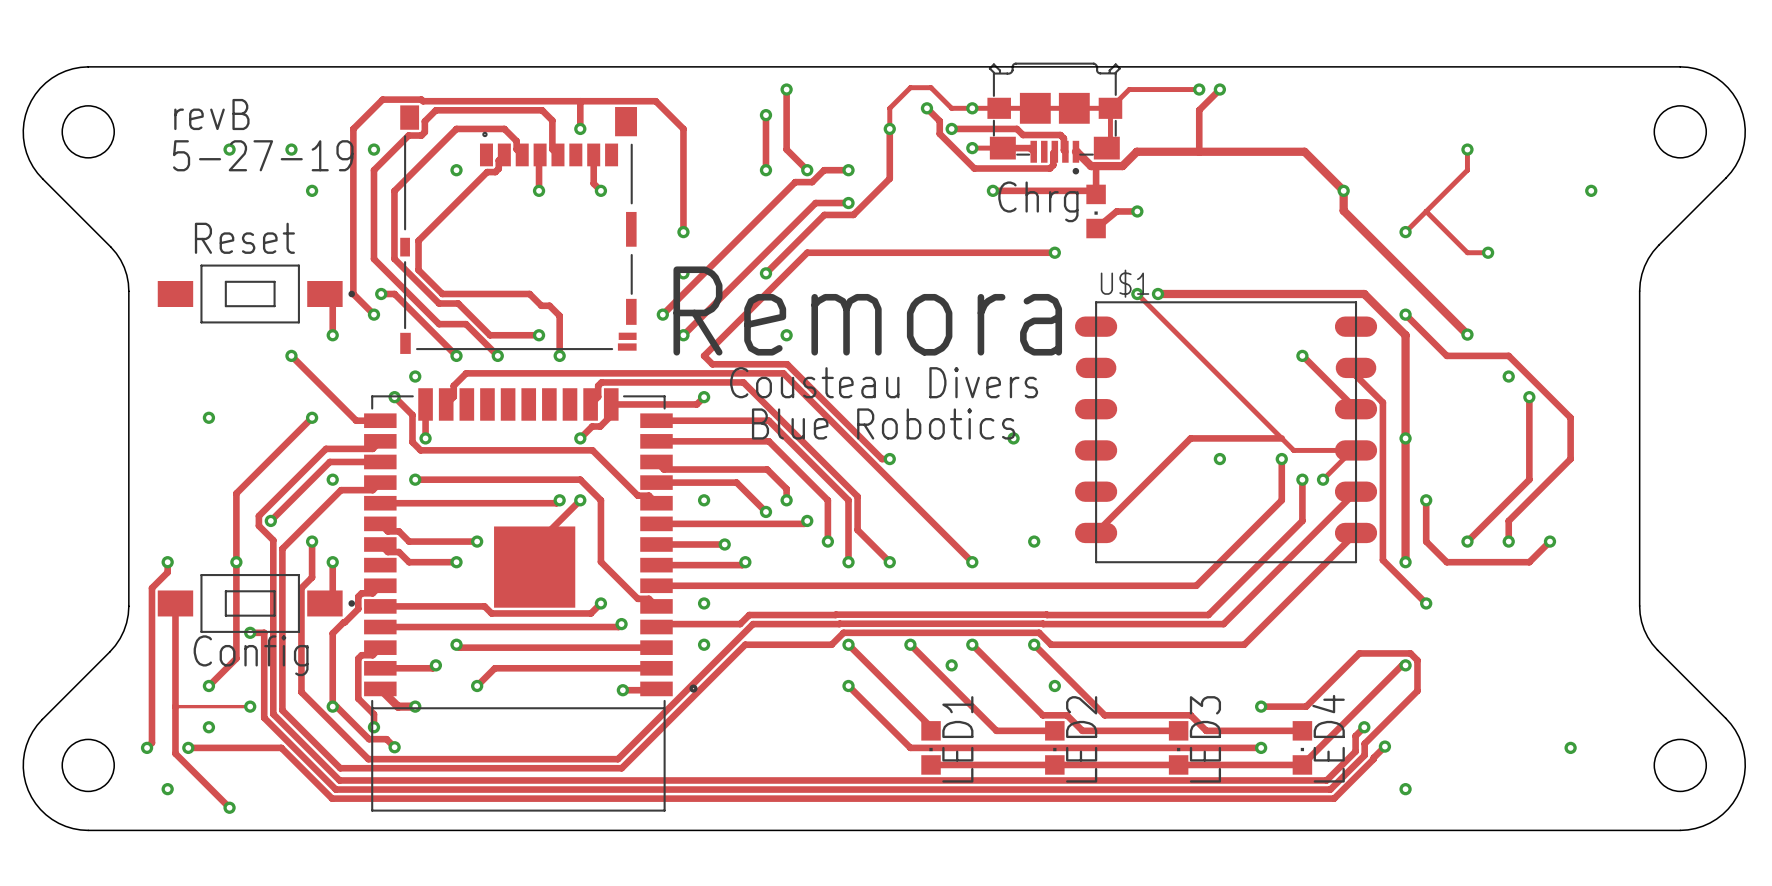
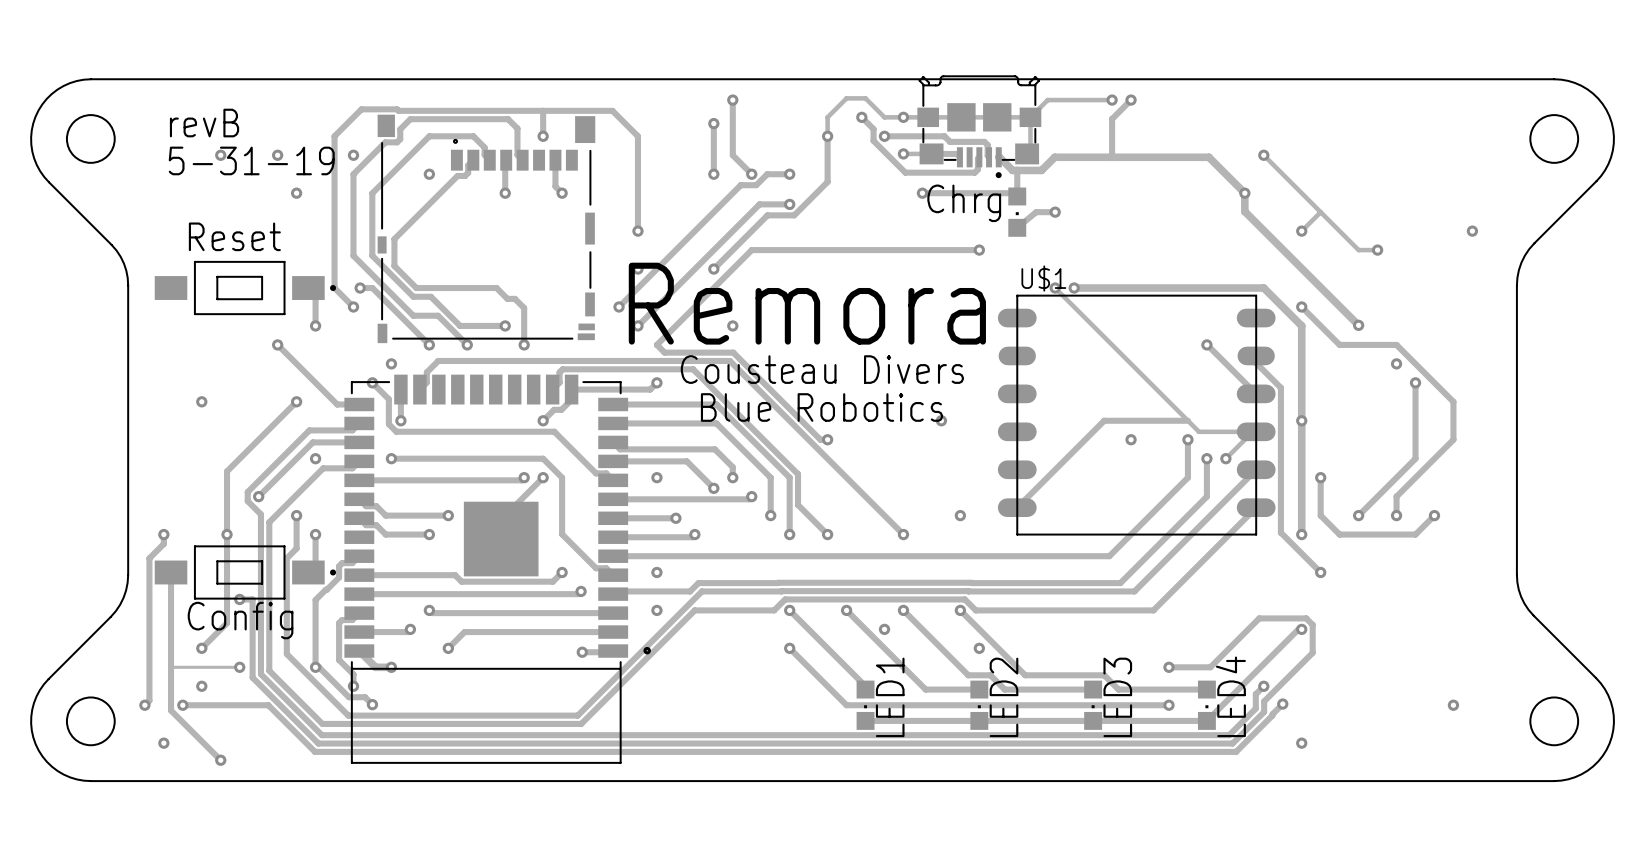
via: none -> (1263, 155)
track: (1467, 149) (1467, 170) (1426, 211) -> (1263, 155) (1320, 212)
via: (1467, 149) -> none
text: 5-27-19 (263, 155) -> 5-31-19 (251, 160)
via position: (1591, 190) -> (1472, 231)

